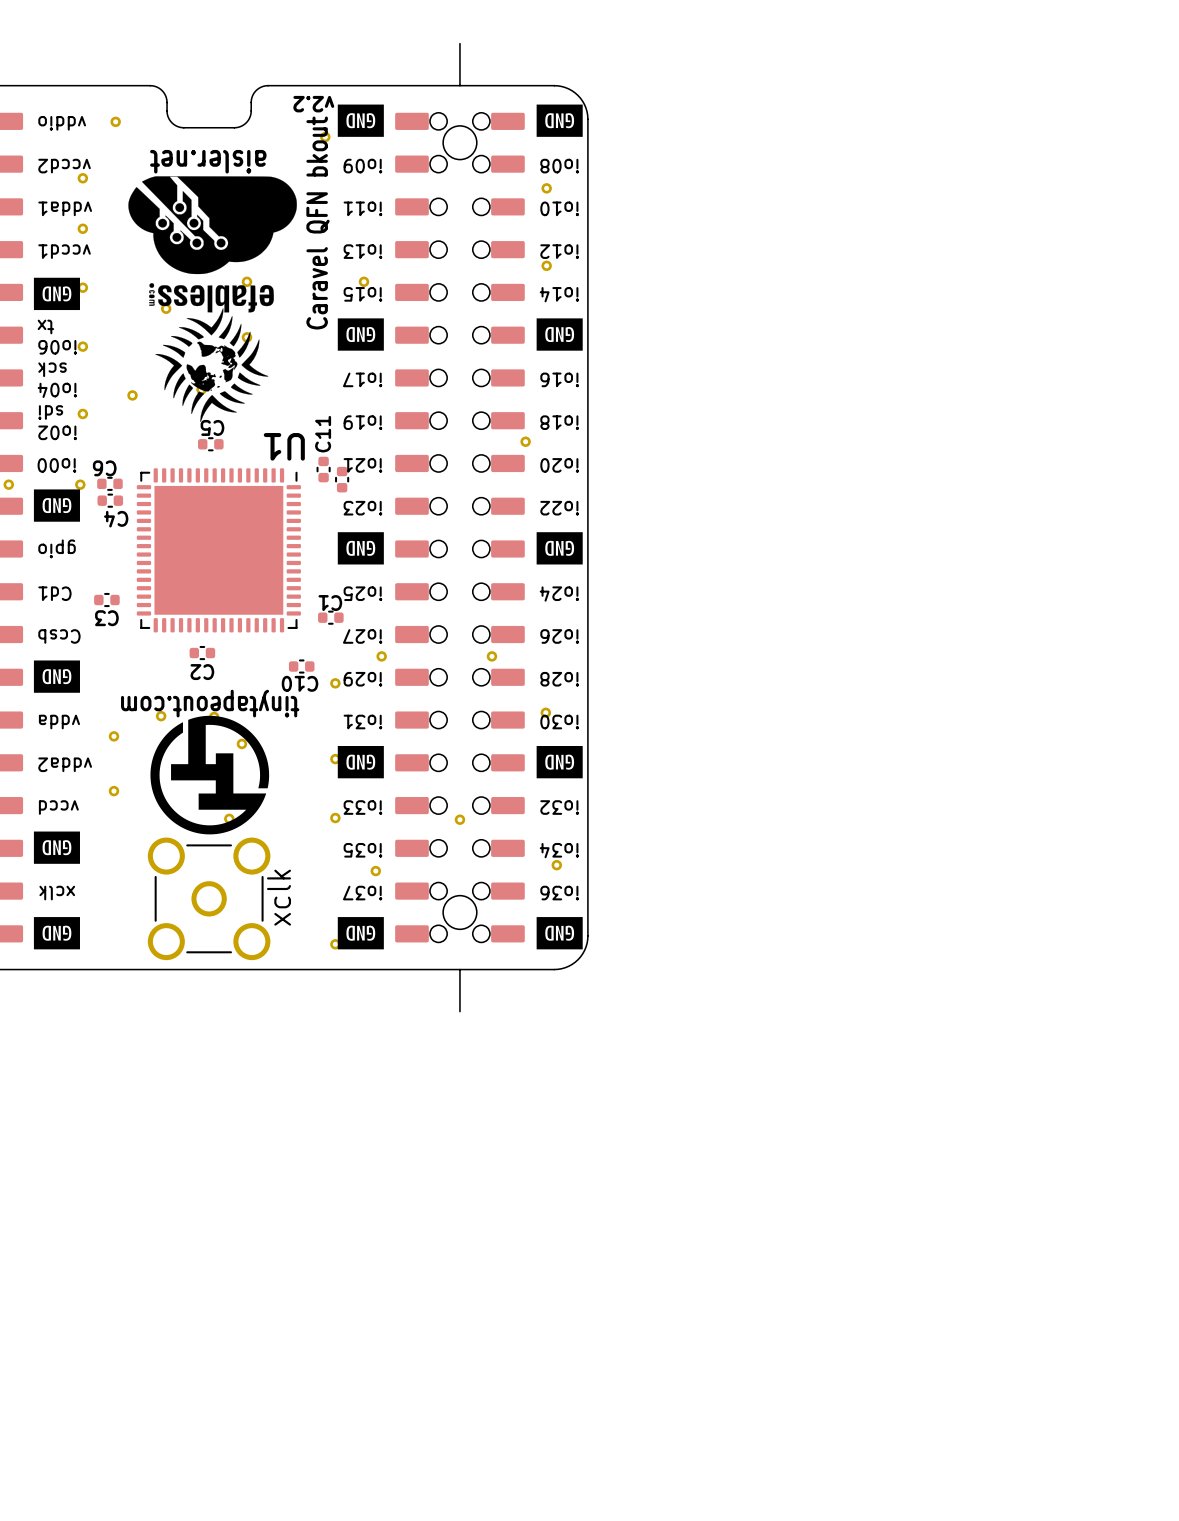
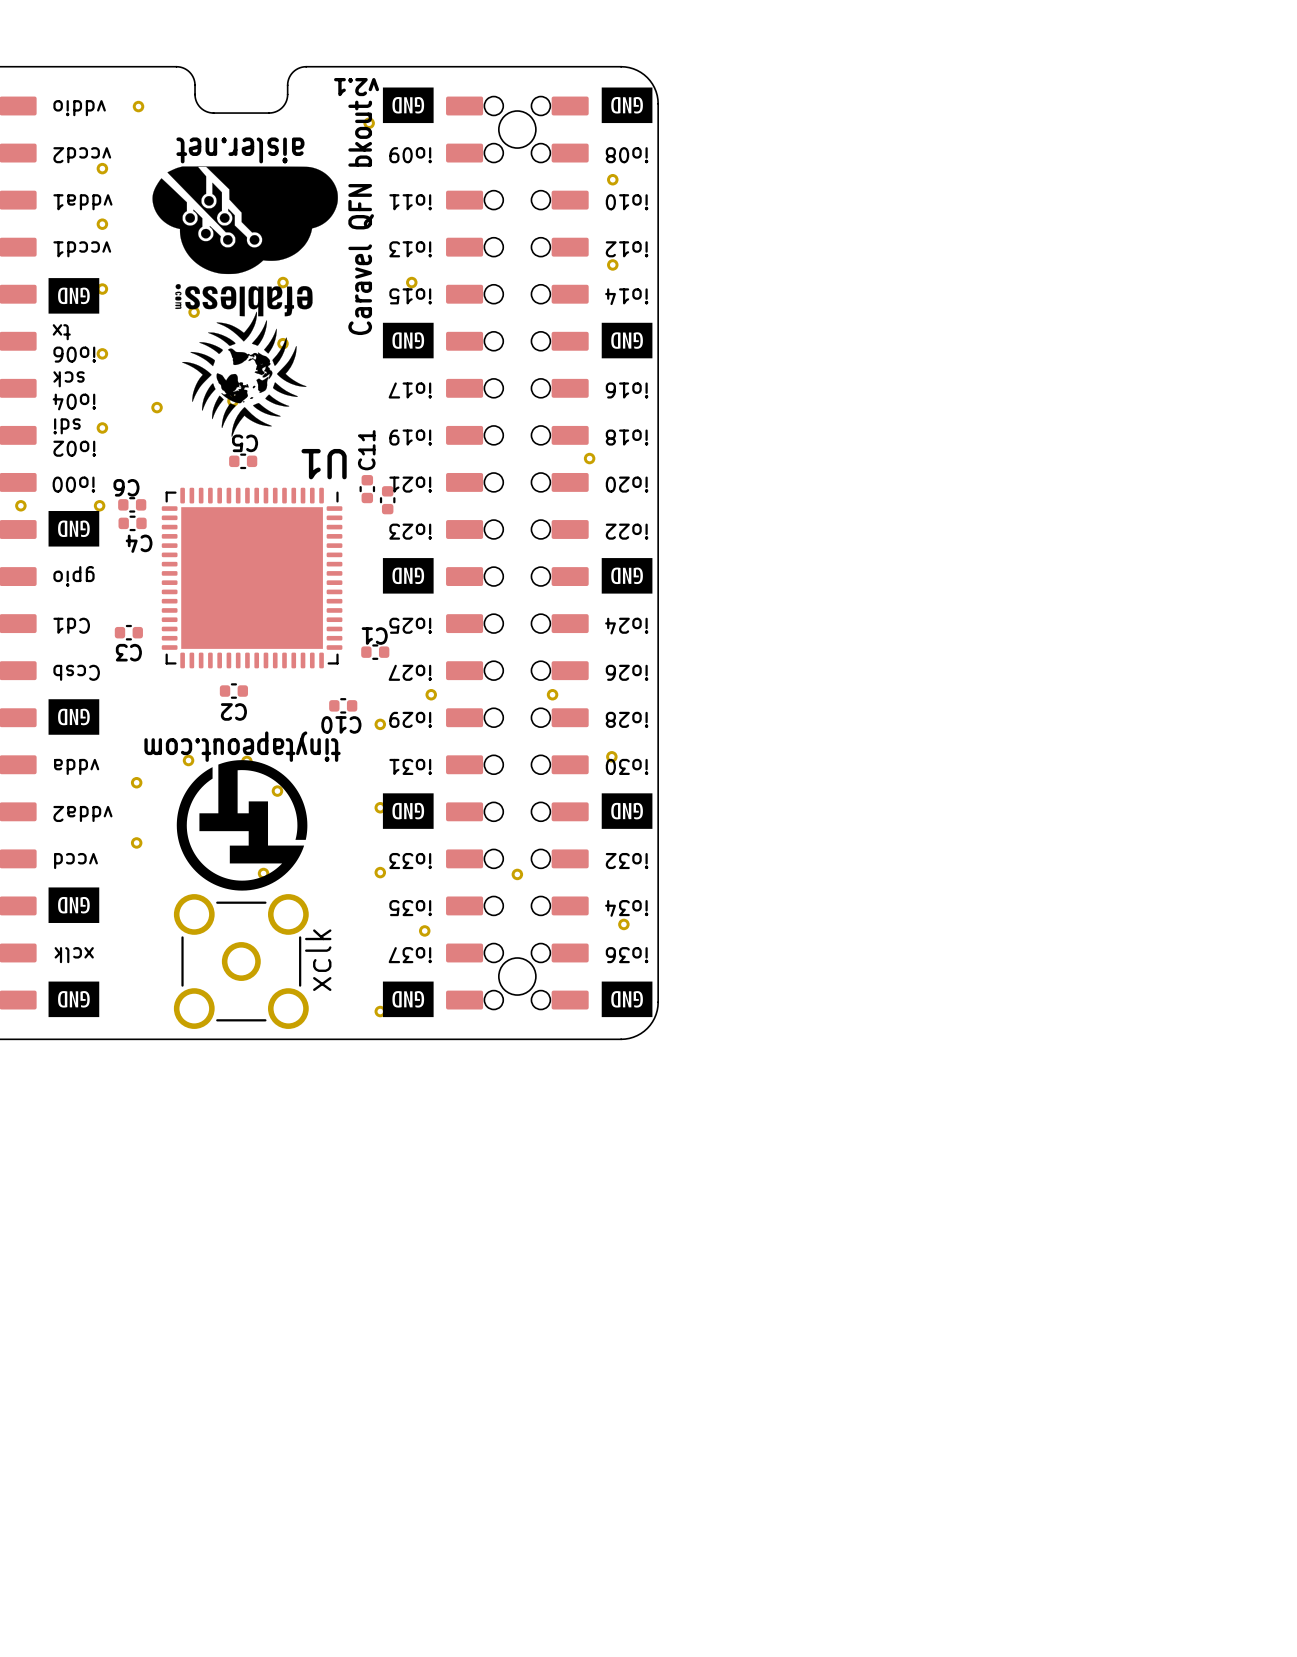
board edge: (459, 43) (459, 85) -> none
text: v2.2 (313, 104) -> v2.1 (356, 87)
board edge: (459, 969) (459, 1011) -> none

